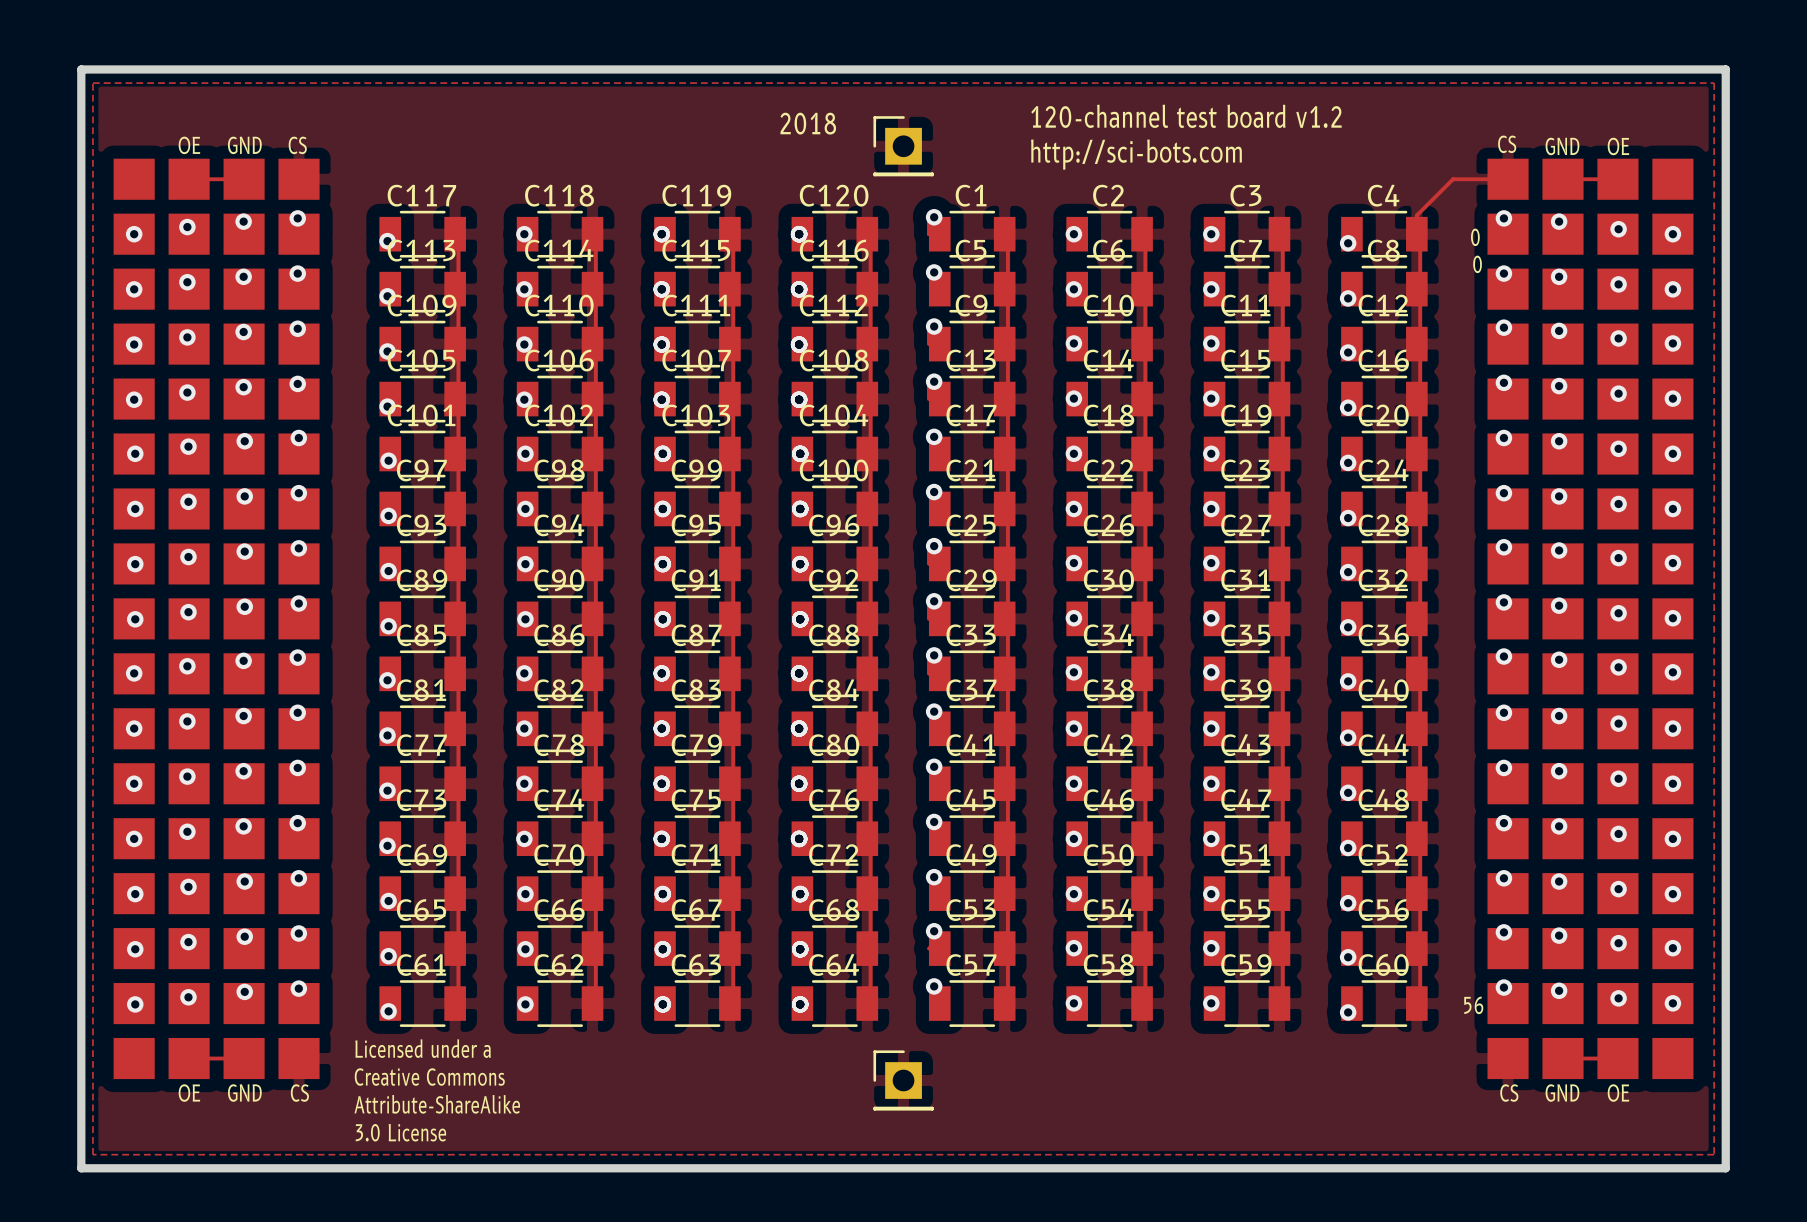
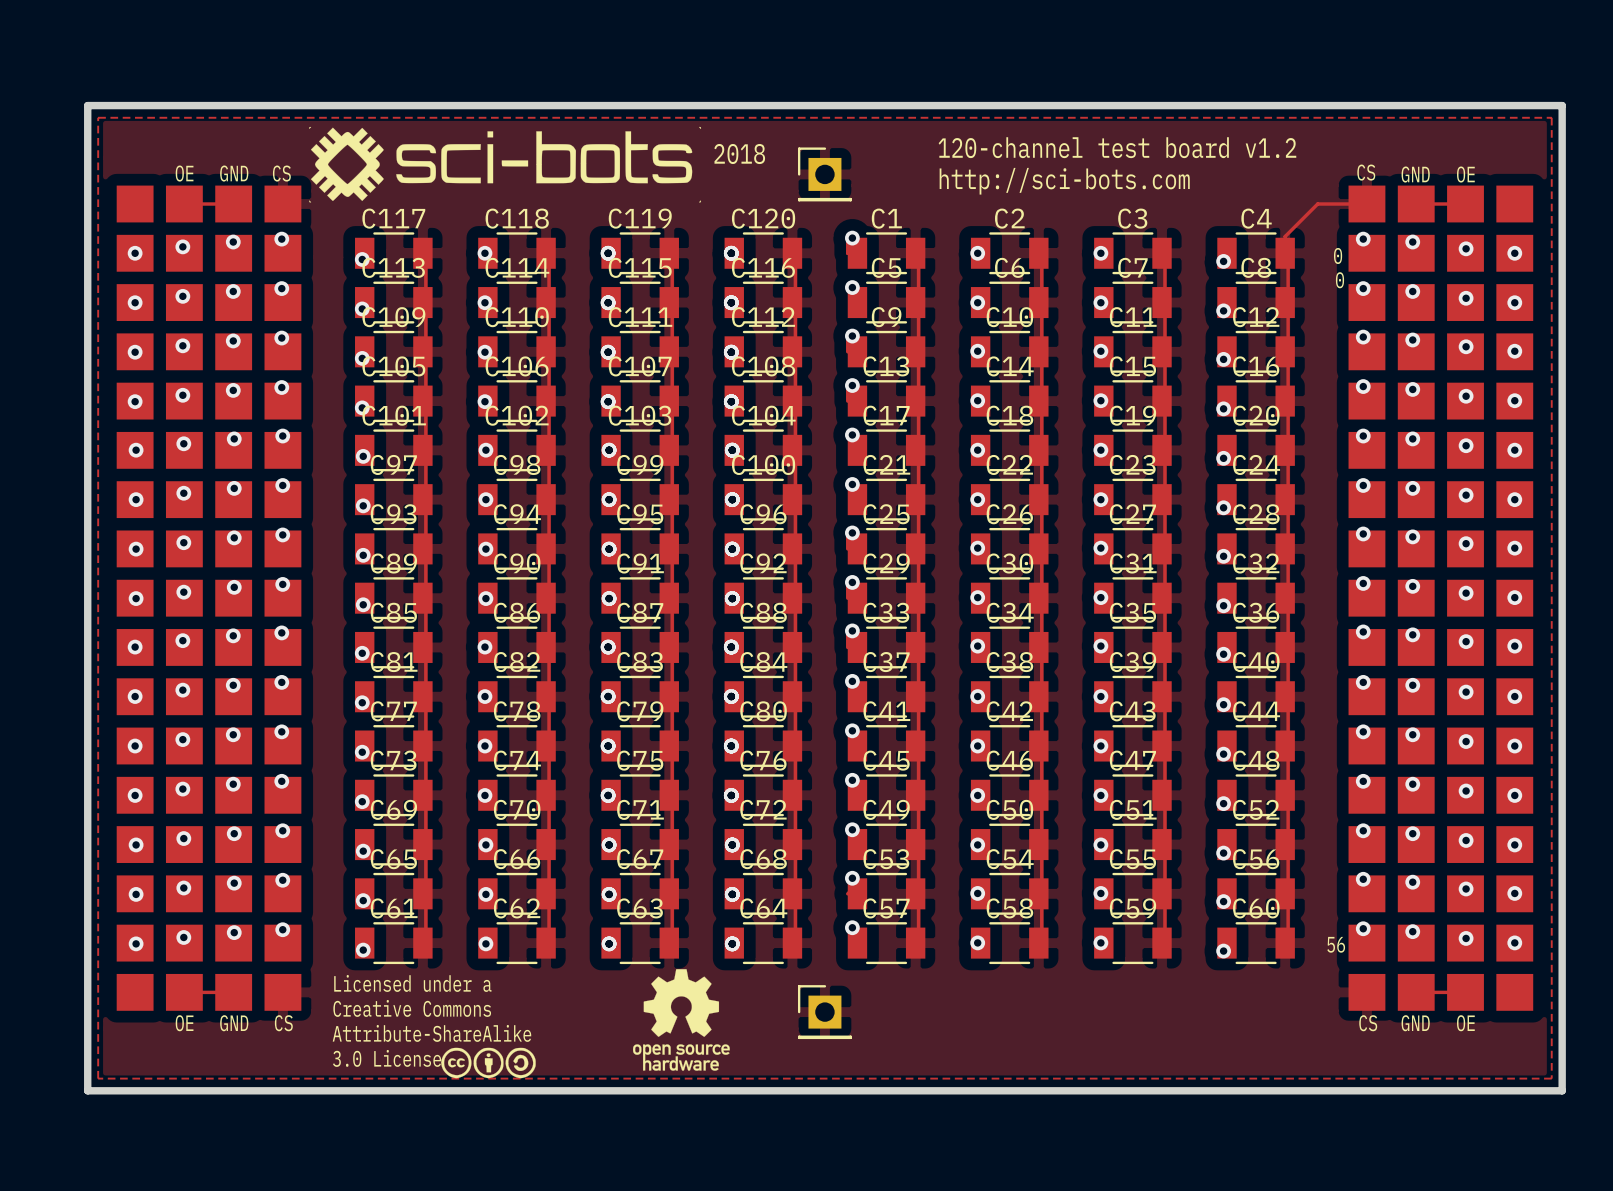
drawing: none -> [309, 126, 702, 203]
drawing: none -> [633, 969, 730, 1071]
drawing: none -> [441, 1047, 536, 1079]

